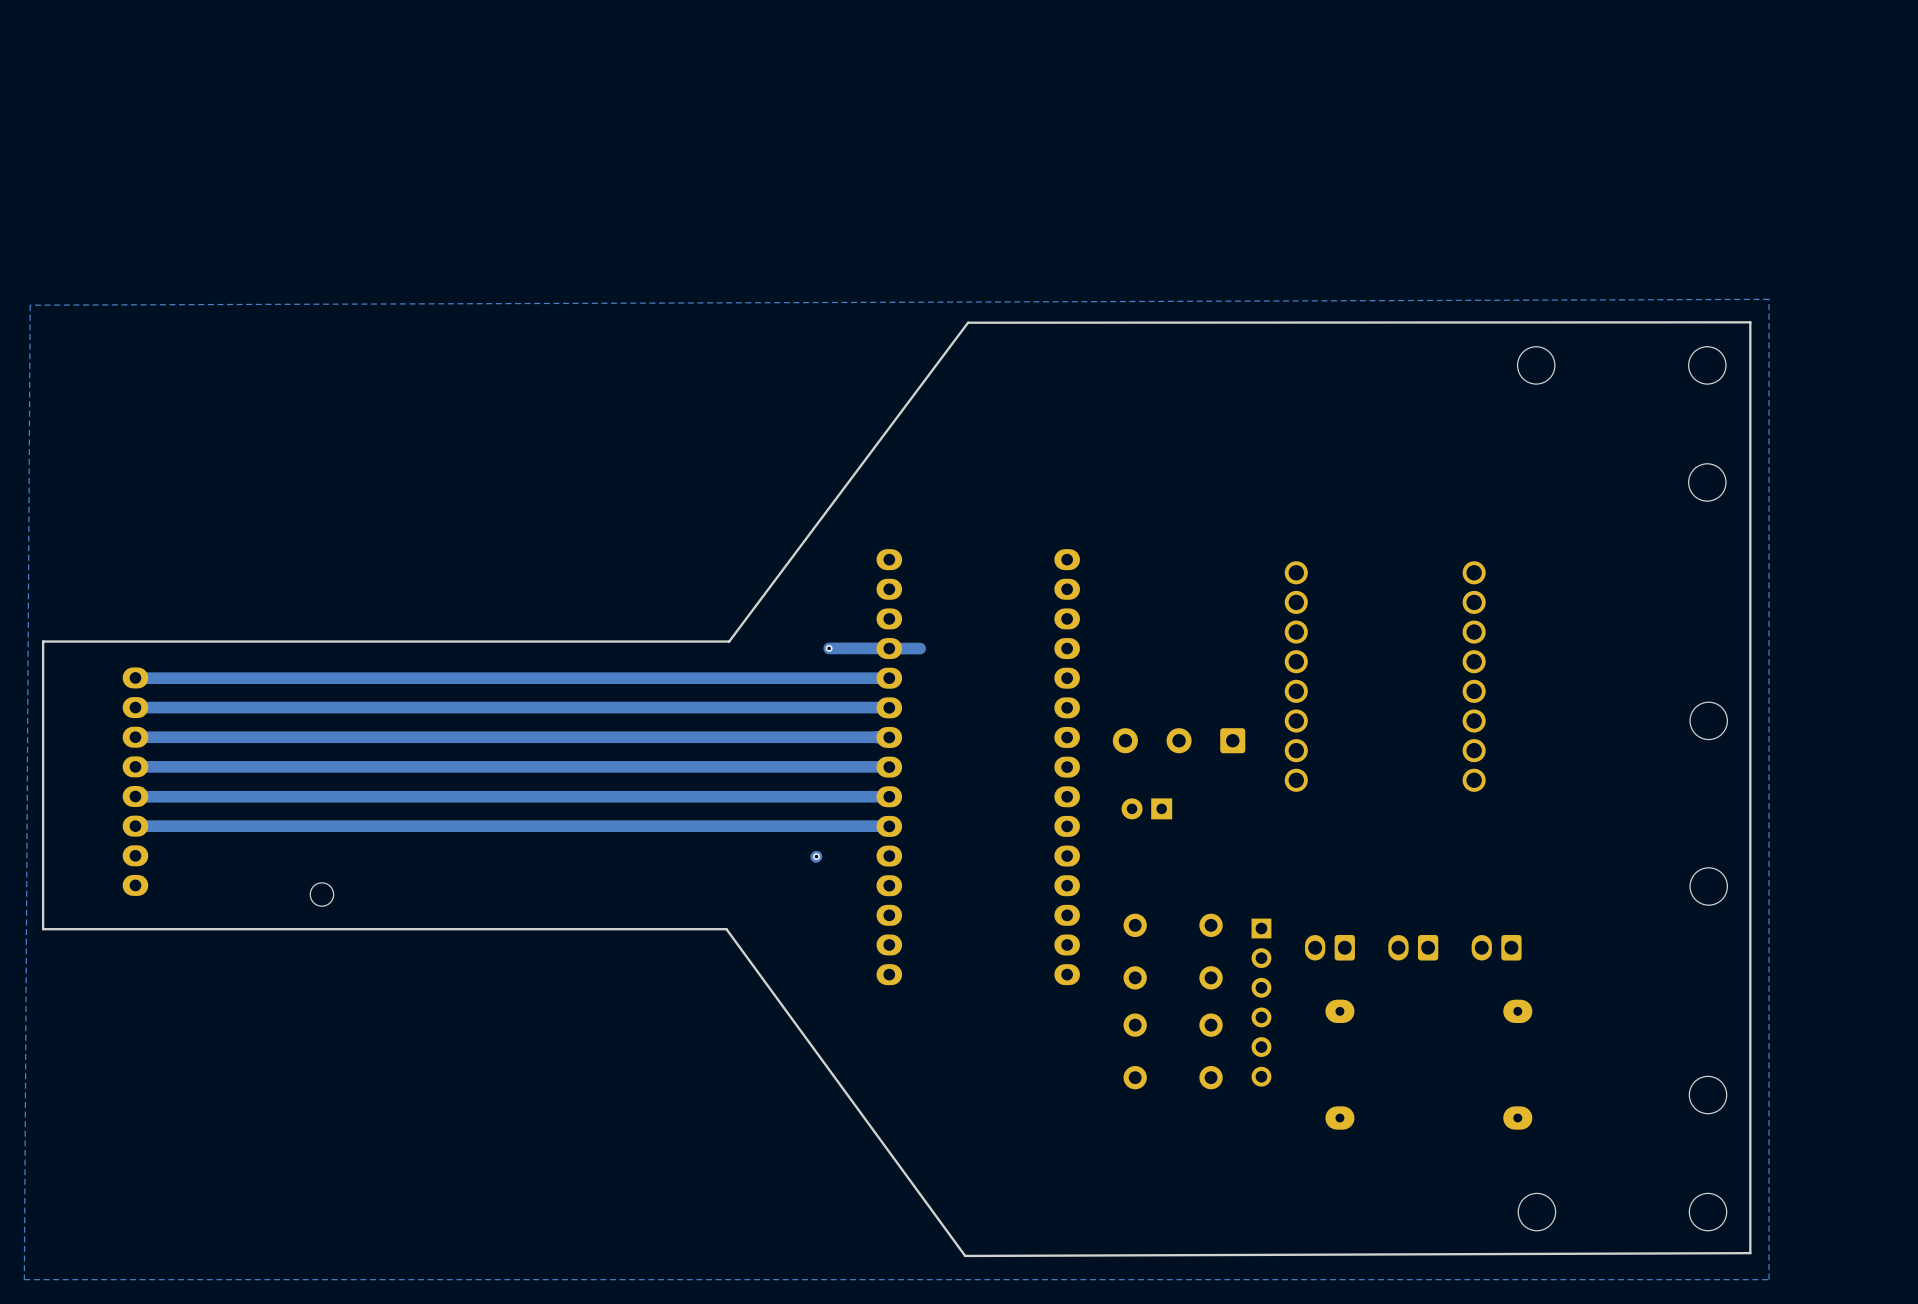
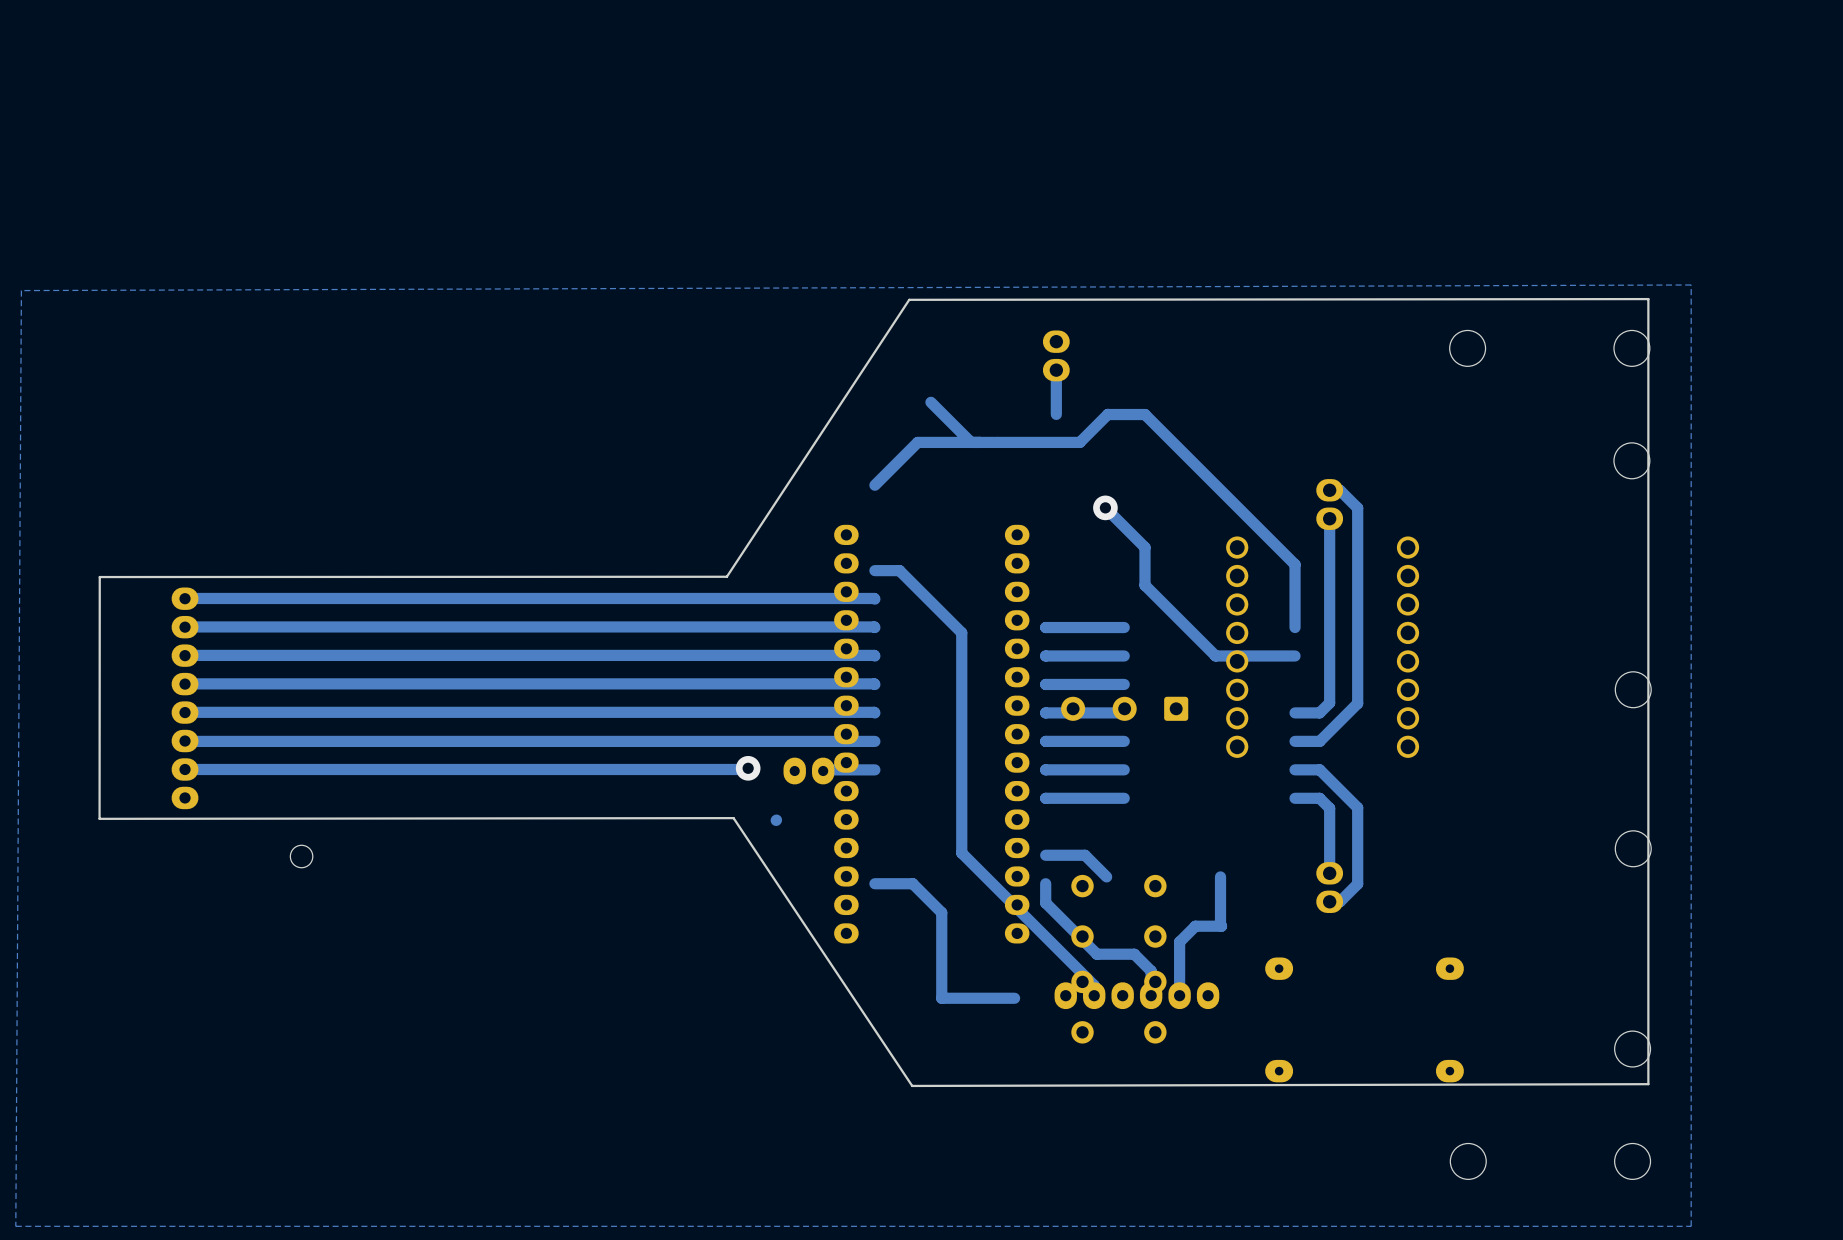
board edge: (1750, 322) (968, 322) (729, 641) (43, 641) (43, 929) (726, 929) (965, 1255) (1750, 1253) (1750, 322) -> (1648, 299) (1648, 1084) (912, 1085) (733, 818) (99, 818) (99, 577) (726, 576) (909, 299) (1648, 299)
part: none -> (1056, 355)
track: none -> (1056, 370) (1056, 414)
track: none -> (930, 402) (971, 442)
track: none -> (1107, 414) (1079, 442) (917, 442) (874, 485)
track: none -> (1108, 414) (1144, 414) (1295, 564) (1295, 627)
track: none -> (1329, 490) (1339, 490) (1357, 508) (1357, 703) (1319, 741) (1295, 741)
part: none -> (1329, 504)
track: none -> (1105, 507) (1144, 547) (1144, 585) (1215, 655) (1295, 655)
via: none -> (1105, 507)
track: none -> (1329, 518) (1329, 702) (1319, 712) (1295, 712)
track: none -> (874, 570) (899, 570) (961, 632) (961, 853) (1094, 985) (1094, 995)
track: none -> (185, 598) (874, 599)
via: (829, 648) -> none
track: (889, 648) (829, 648) -> none
track: (920, 648) (889, 648) -> none
track: none -> (185, 627) (874, 627)
track: none -> (1124, 627) (1045, 627)
track: (135, 677) (889, 678) (886, 681) -> none
track: none -> (185, 655) (874, 656)
track: none -> (1124, 655) (1045, 655)
track: (135, 707) (889, 707) (885, 711) -> none
track: none -> (185, 684) (874, 684)
track: none -> (1124, 684) (1045, 684)
part: none -> (185, 698)
track: (135, 737) (889, 737) (885, 740) -> none
track: none -> (185, 712) (874, 712)
track: none -> (1124, 712) (1045, 712)
track: (889, 766) (135, 766) -> none
track: none -> (185, 741) (874, 741)
track: none -> (1124, 741) (1045, 741)
part: (135, 781) -> none
track: (135, 796) (889, 796) -> none
track: none -> (748, 768) (185, 769)
via: none -> (748, 768)
track: none -> (874, 769) (823, 771)
track: none -> (1124, 769) (1045, 769)
track: none -> (1295, 769) (1319, 769) (1357, 807) (1357, 883) (1339, 901) (1329, 901)
part: none -> (808, 771)
part: (1146, 808) -> none
track: (135, 826) (889, 826) (886, 829) -> none
track: none -> (1124, 798) (1045, 798)
track: none -> (1295, 798) (1319, 798) (1329, 808) (1329, 873)
via: (816, 856) -> none
track: none -> (1045, 855) (1085, 855) (1106, 876)
track: none -> (1220, 876) (1221, 926) (1195, 926) (1179, 942) (1179, 995)
track: none -> (874, 883) (912, 883) (941, 912) (941, 998) (1014, 998)
track: none -> (1045, 883) (1045, 902) (1096, 954) (1134, 954) (1151, 971) (1151, 995)
part: none -> (1329, 887)
part: (1329, 947) -> none
part: (1413, 947) -> none
part: (1496, 947) -> none
part: (1261, 1002) -> none
part: none -> (1136, 995)

